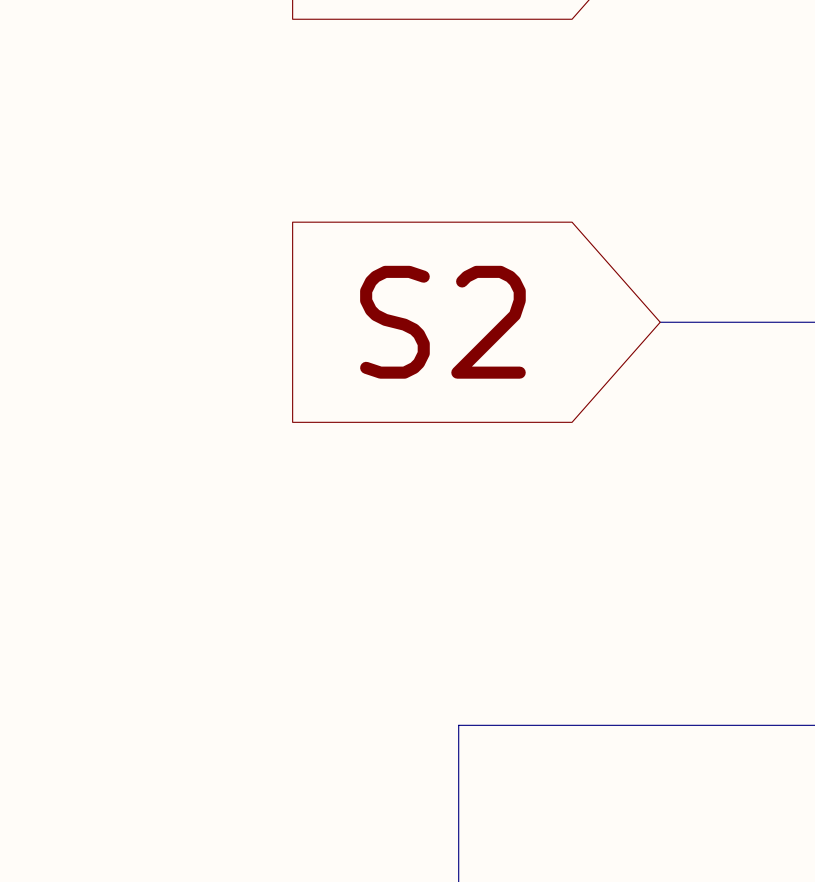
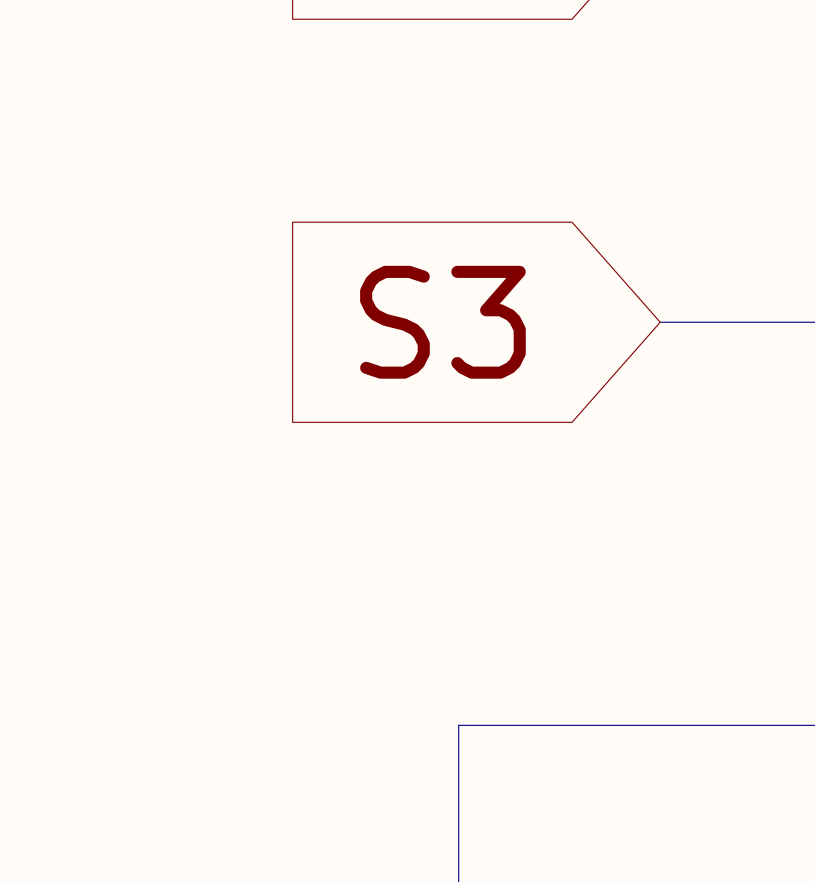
global label: S2 (442, 322) -> S3 (442, 322)

